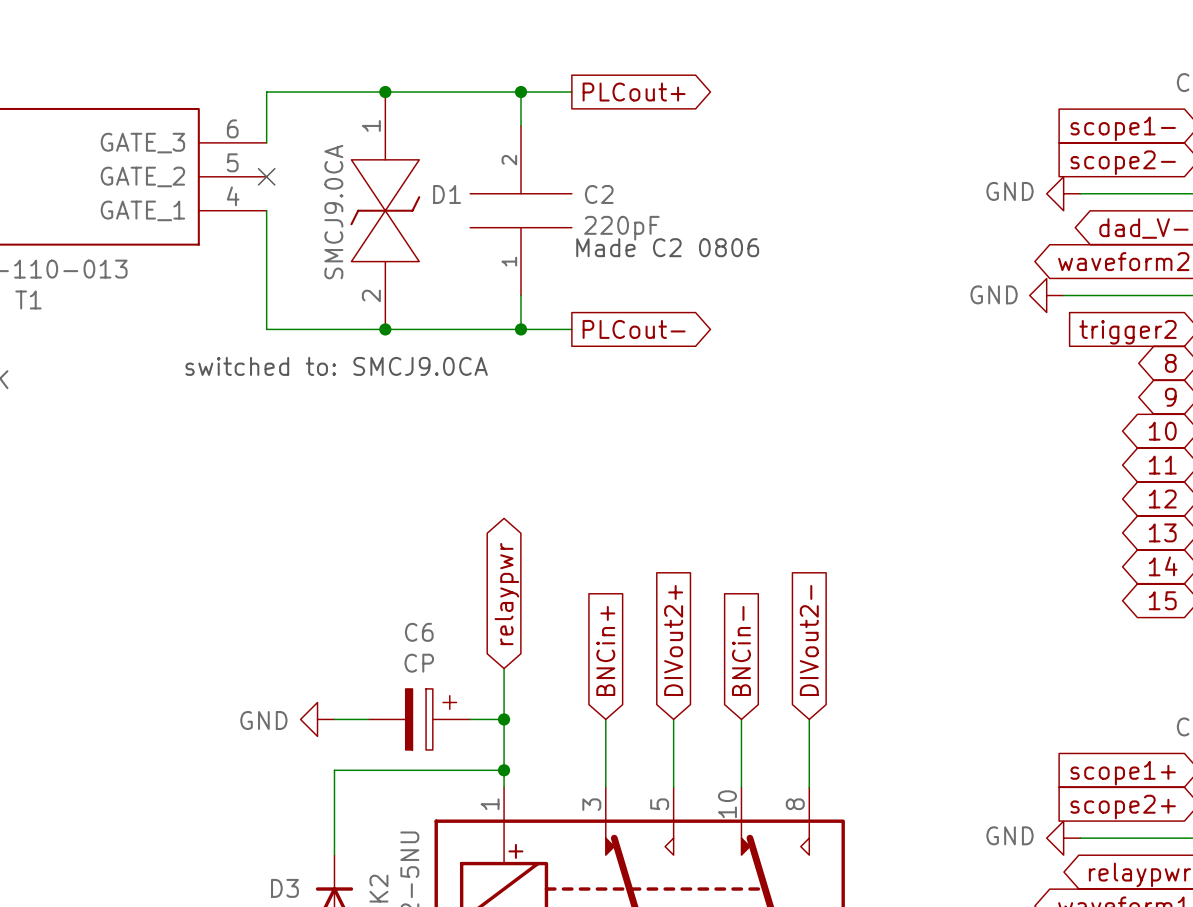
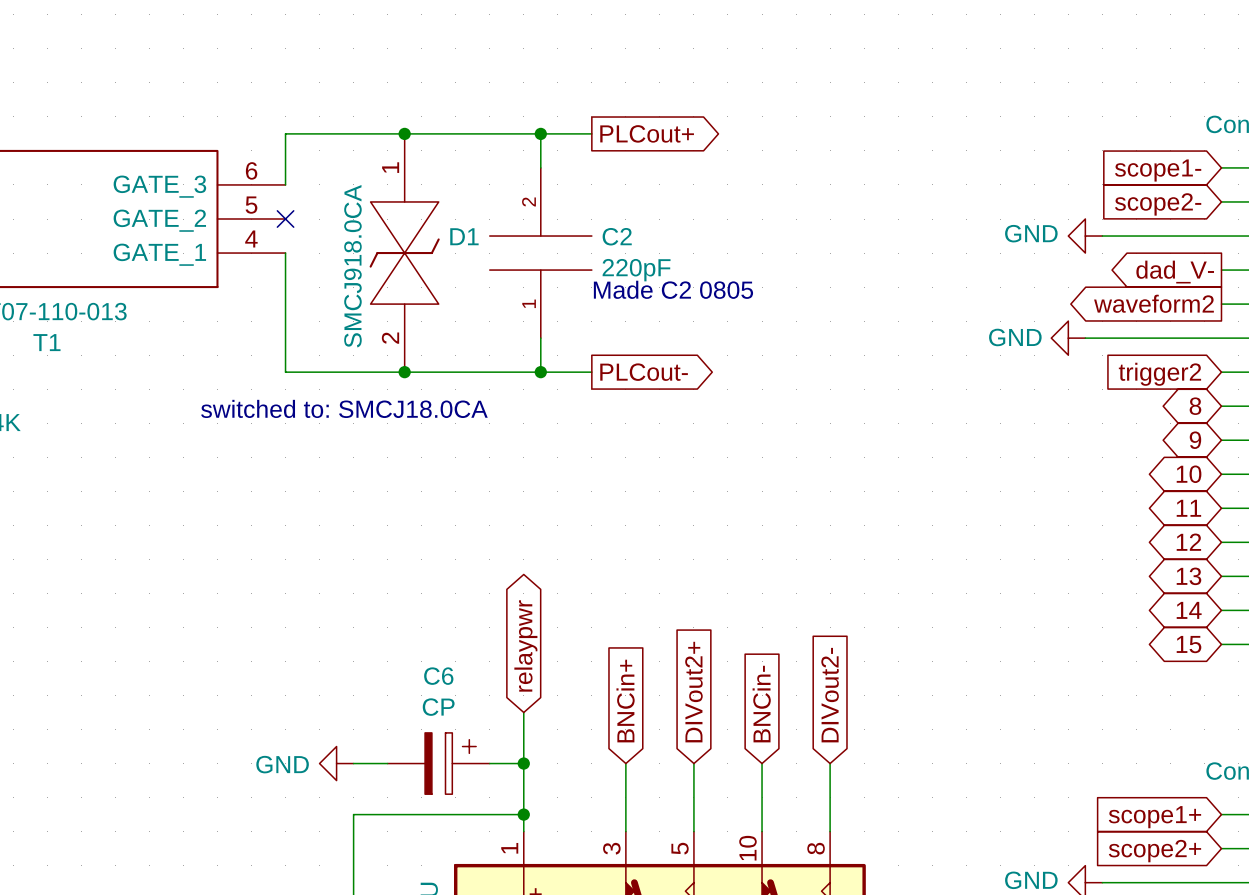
D1 value: SMCJ9.0CA (333, 212) -> SMCJ918.0CA (352, 266)
text: Made C2 0806 (667, 247) -> Made C2 0805 (673, 289)
text: switched to: SMCJ9.0CA (336, 366) -> switched to: SMCJ18.0CA (344, 408)

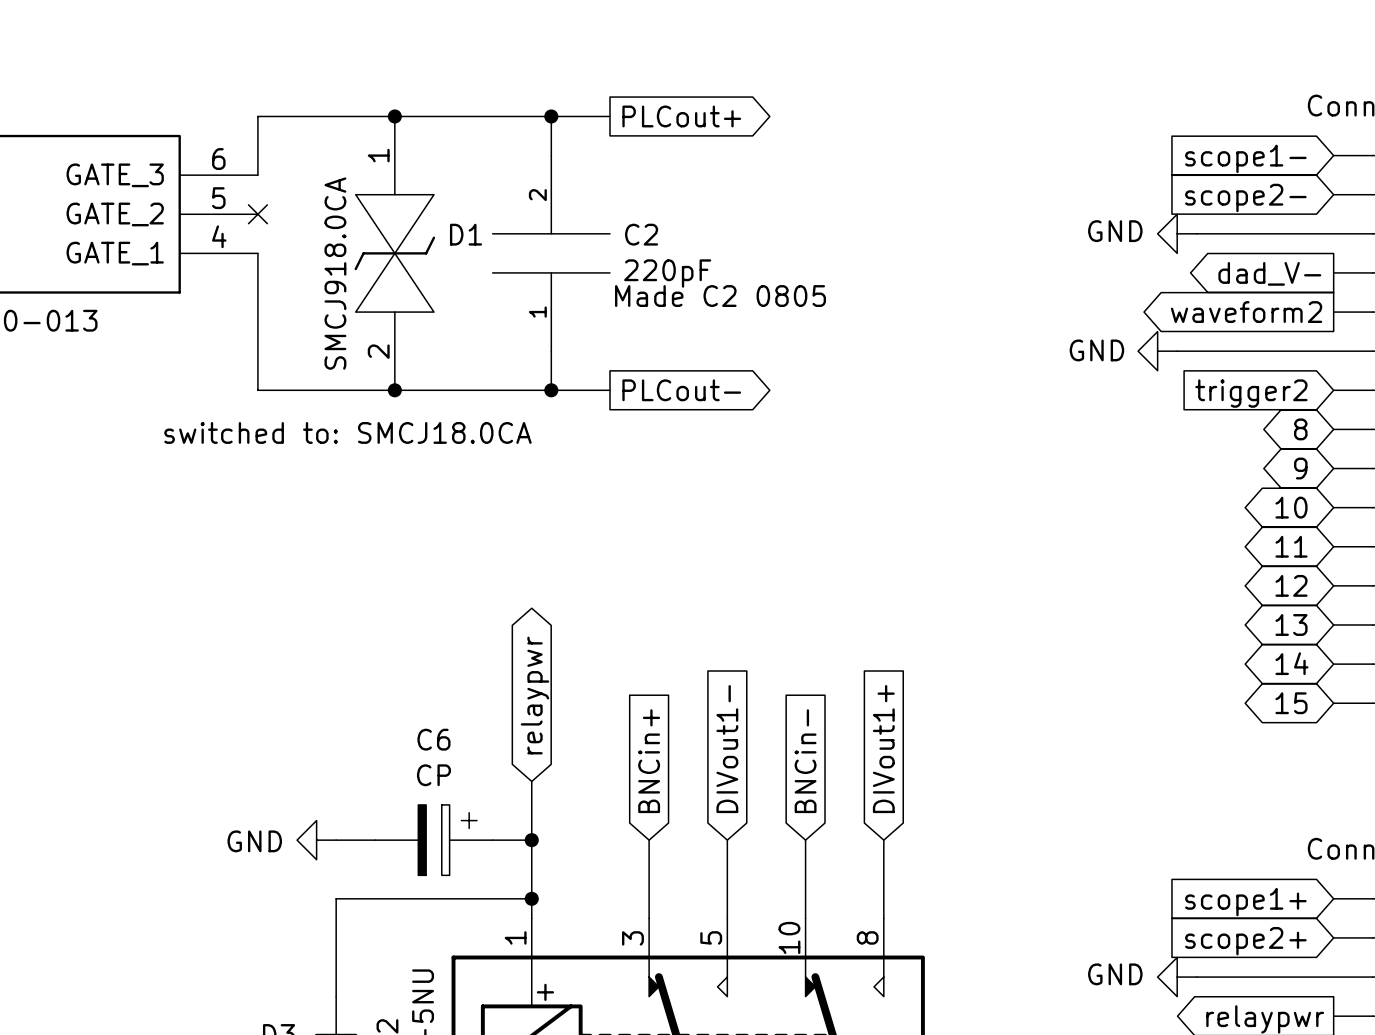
global label: DIVout2+ (693, 692) -> DIVout1- (727, 749)
global label: DIVout2- (830, 695) -> DIVout1+ (883, 749)

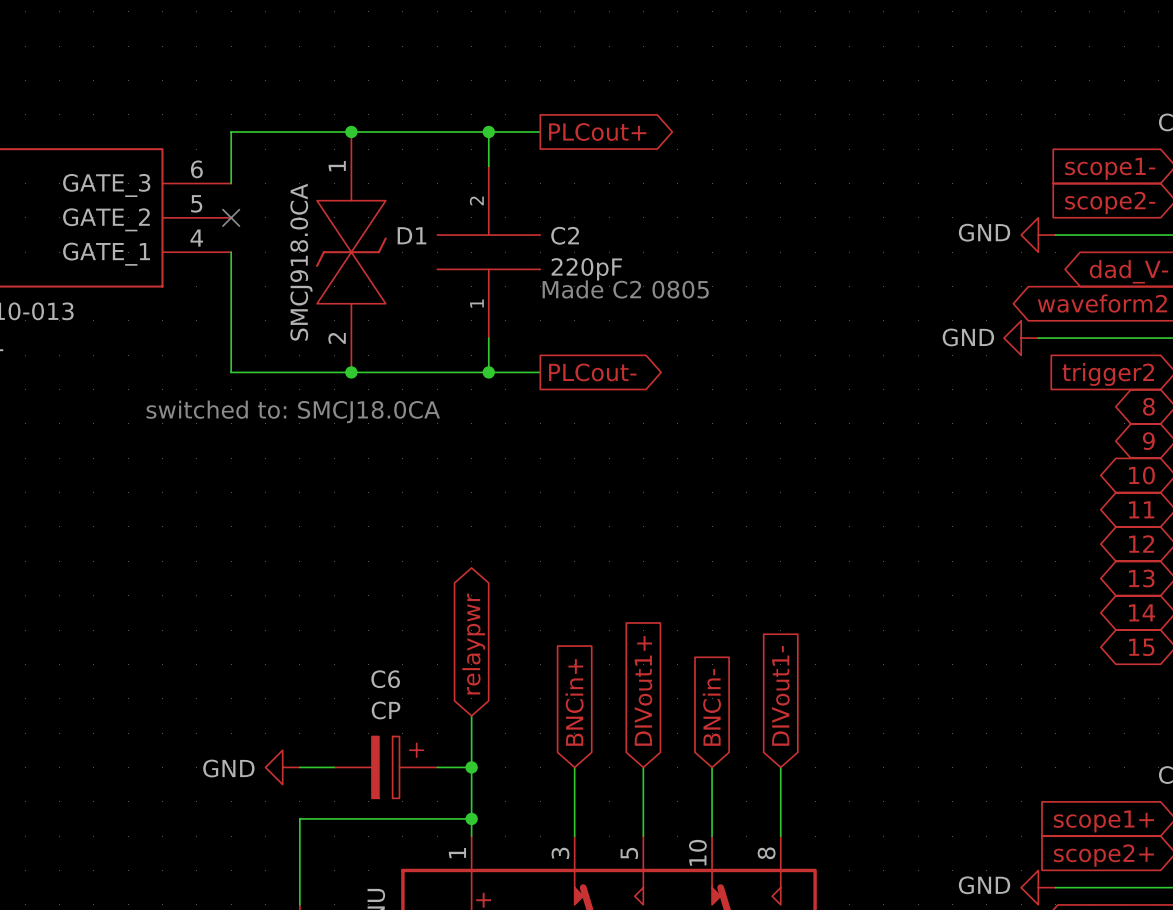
global label: DIVout1- (727, 749) -> DIVout1+ (643, 690)
global label: DIVout1+ (883, 749) -> DIVout1- (780, 695)

